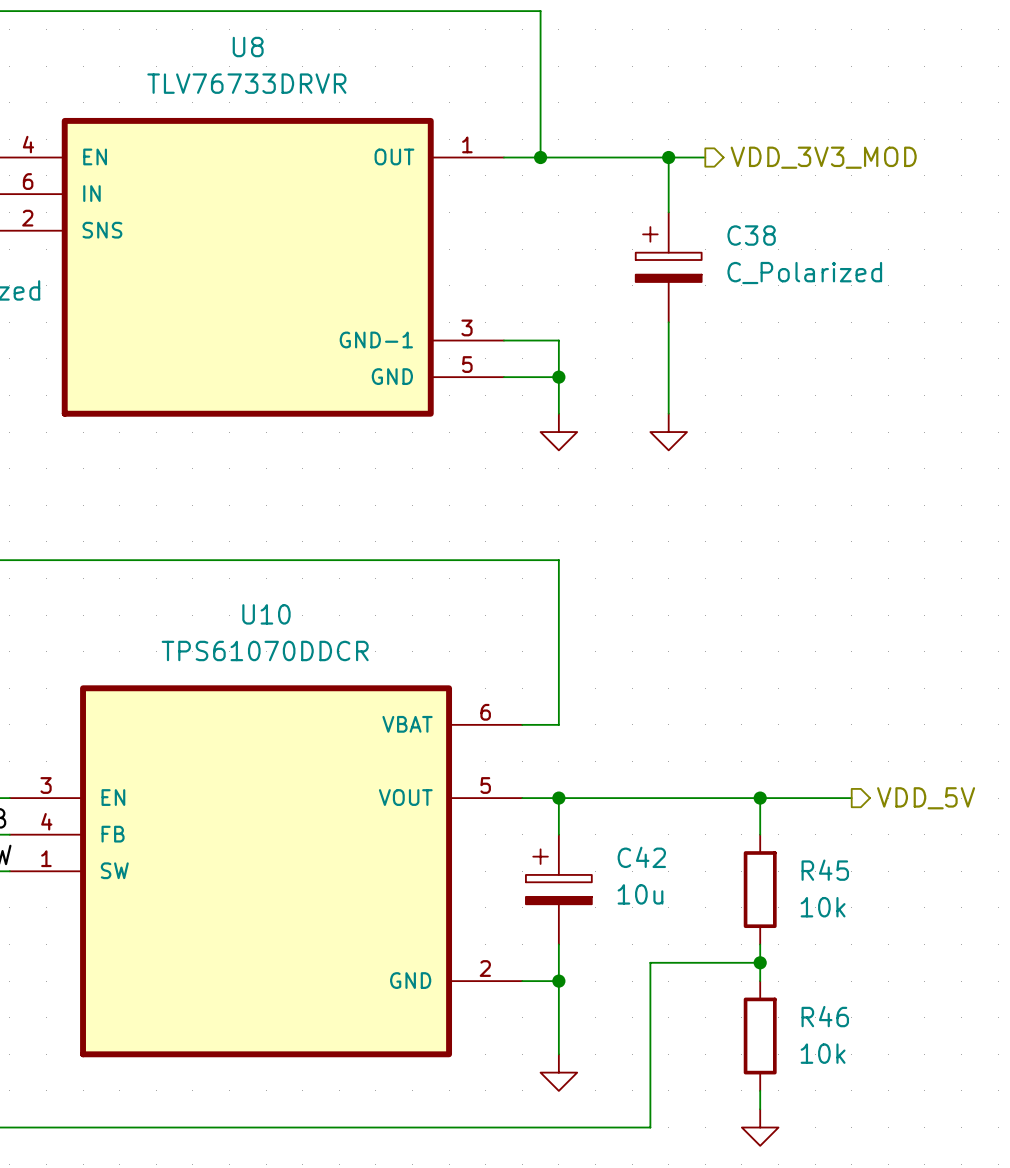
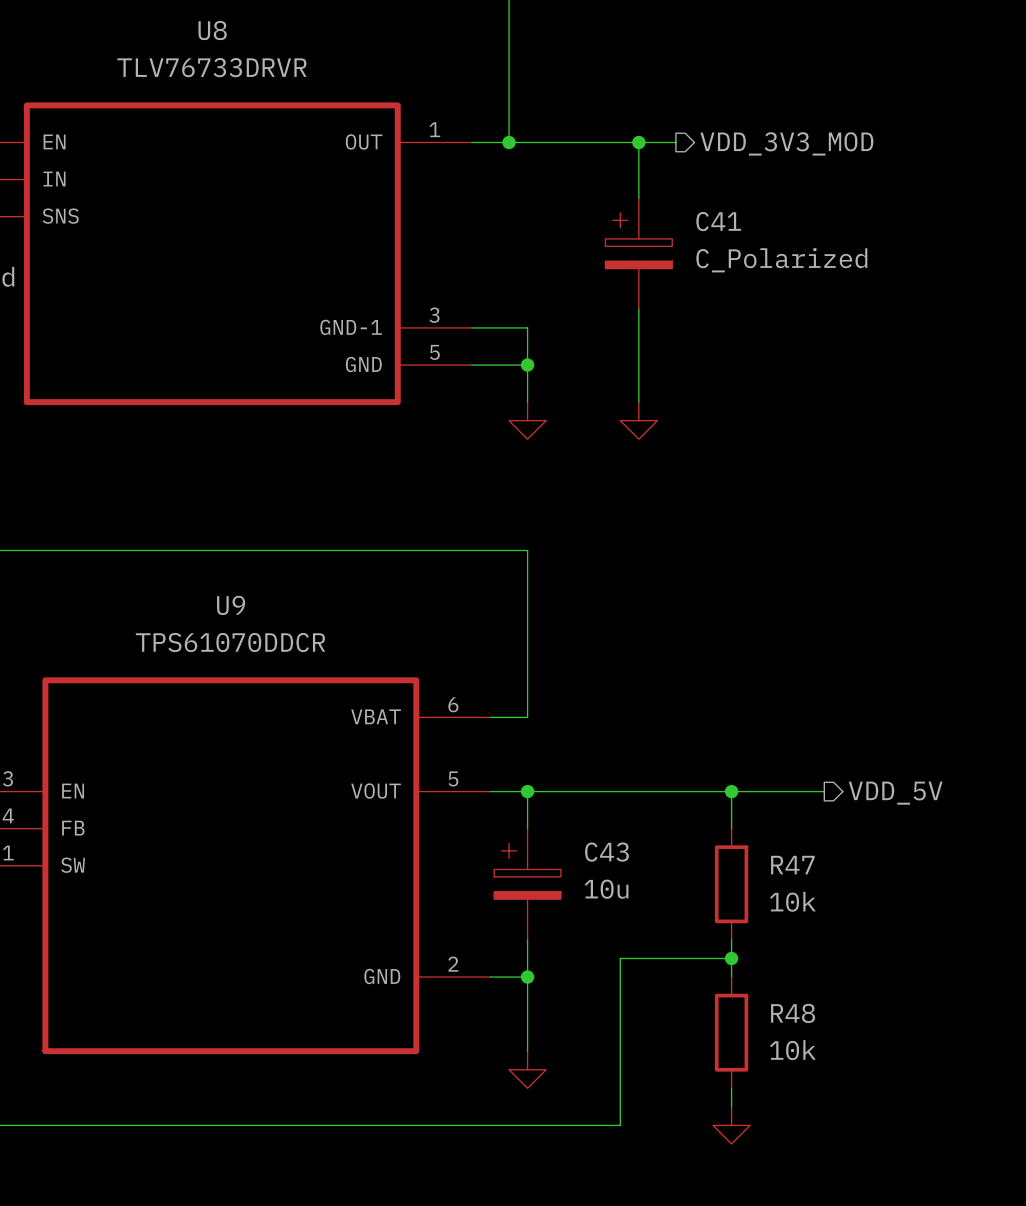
C38 name: C38 (751, 235) -> C41 (718, 221)
U10 name: U10 (266, 614) -> U9 (231, 605)
C42 name: C42 (641, 857) -> C43 (606, 852)
R45 name: R45 (825, 870) -> R47 (792, 865)
R46 name: R46 (825, 1016) -> R48 (793, 1013)

